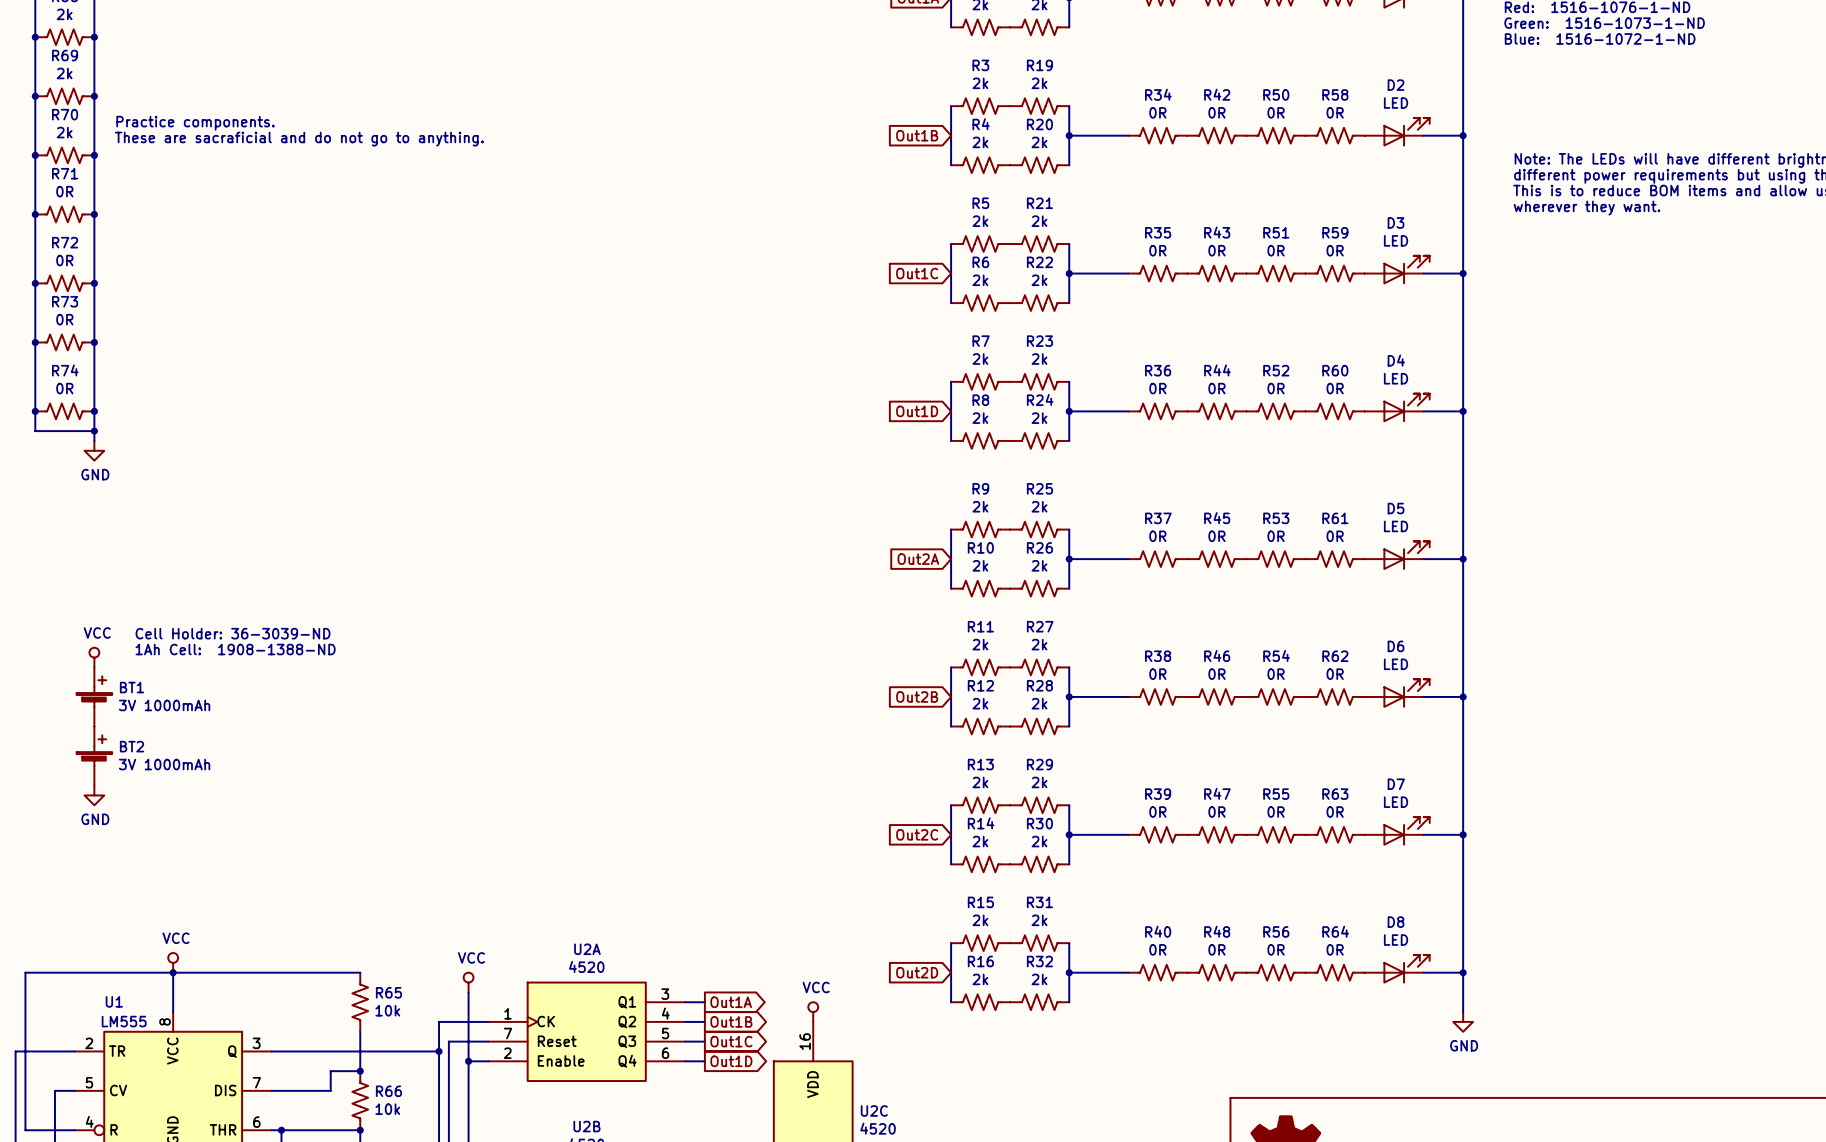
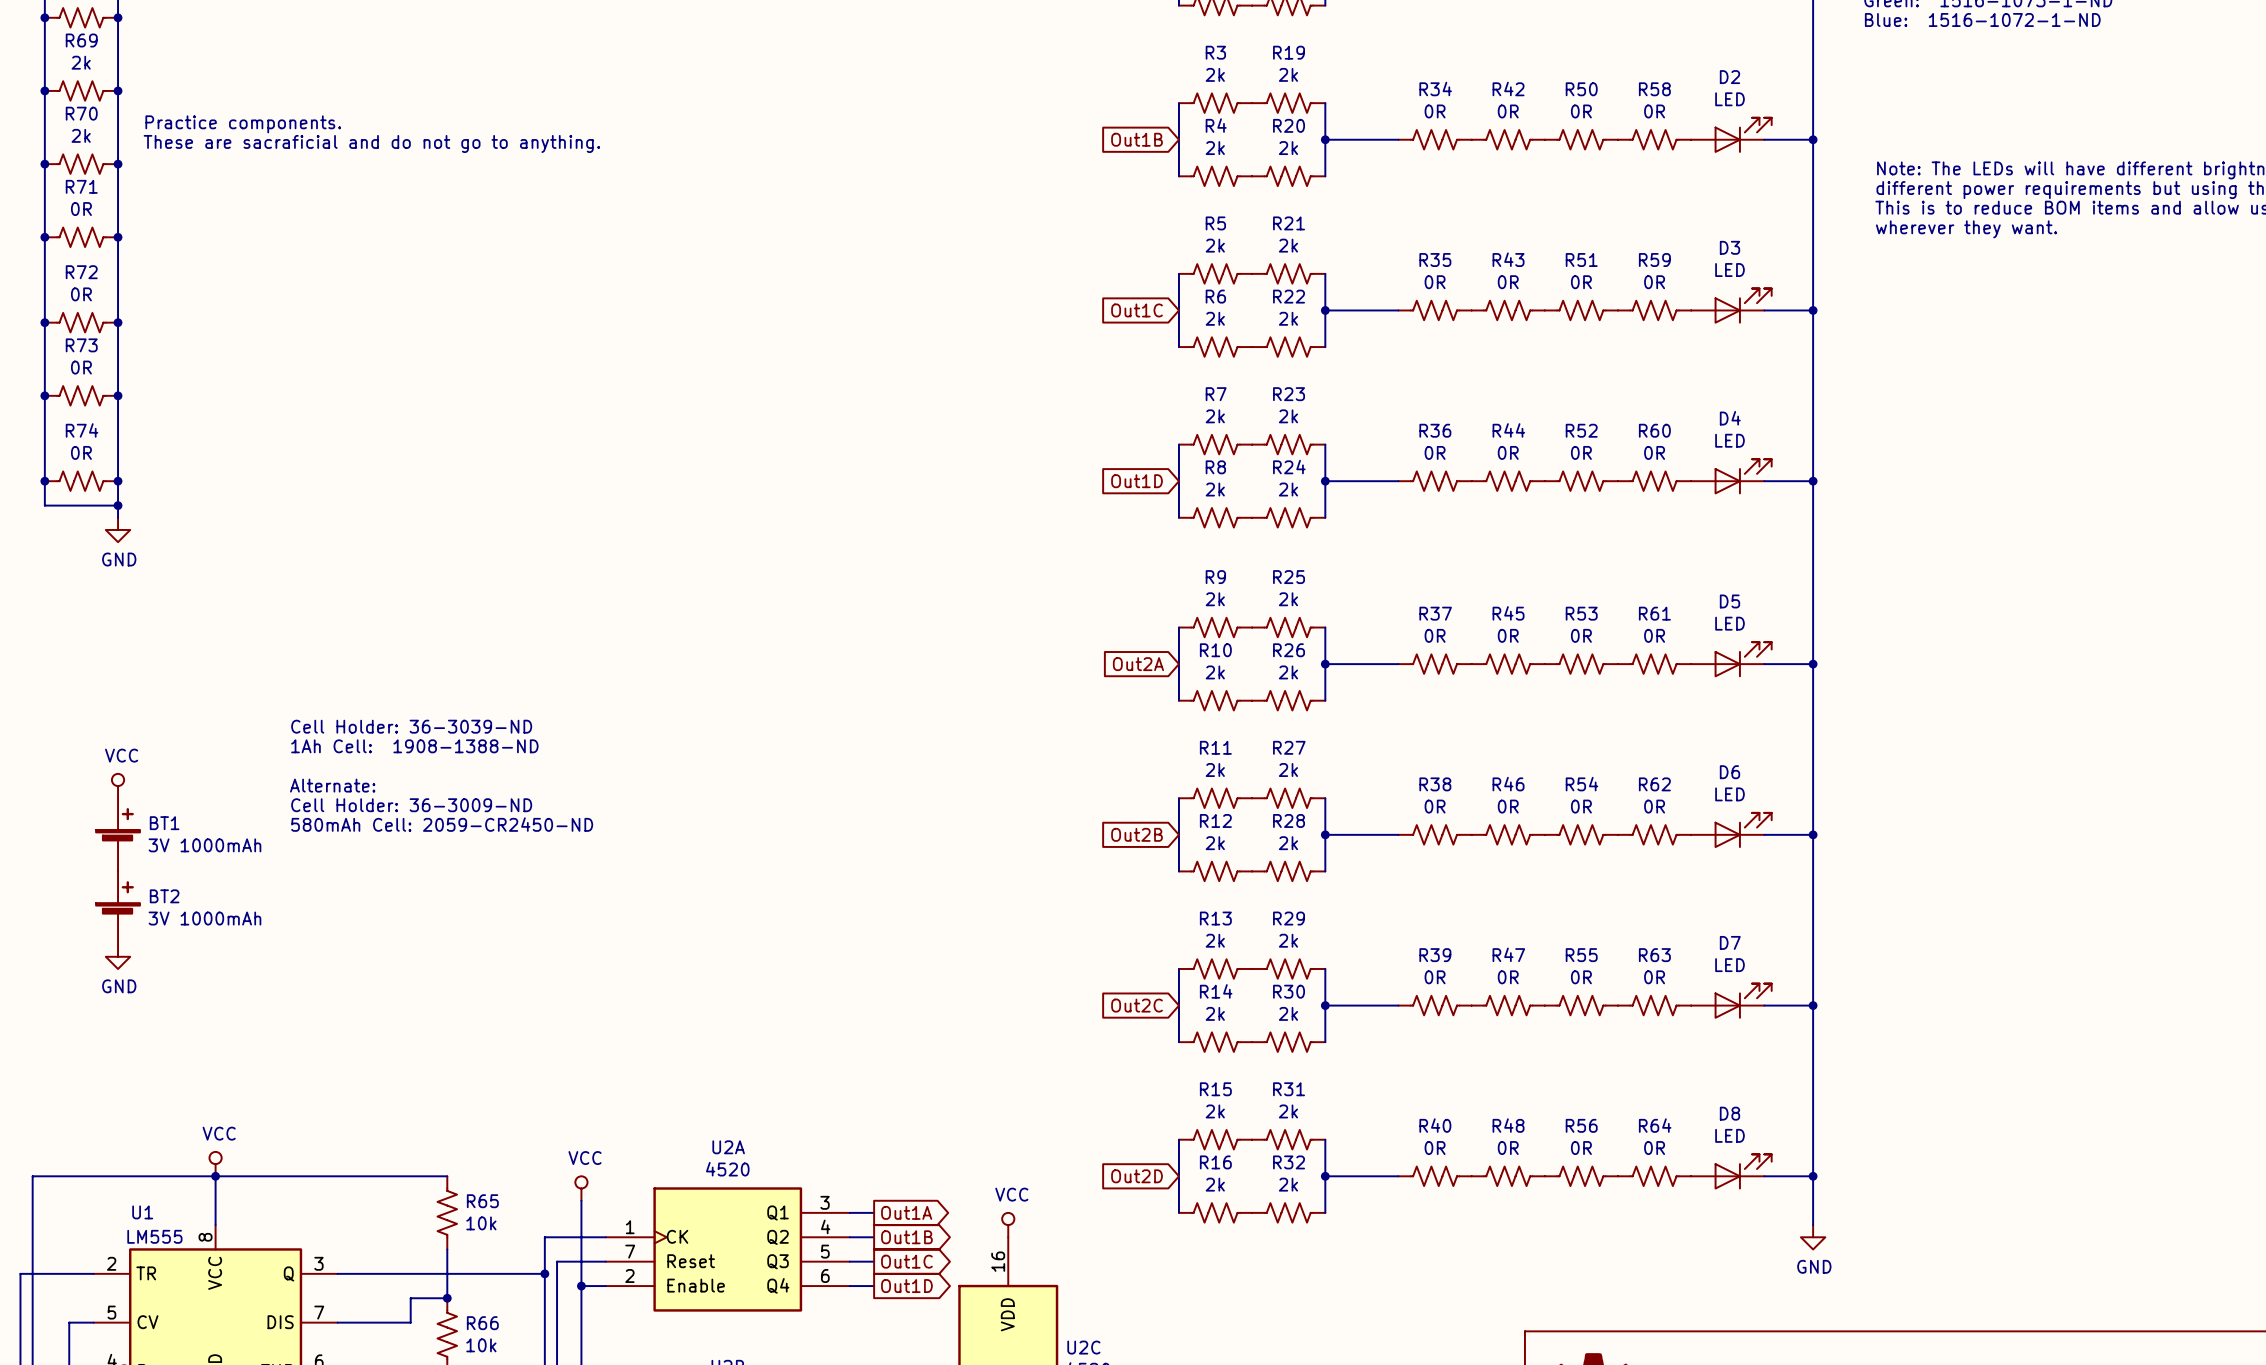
text position: Cell Holder: 36-3039-ND (233, 633) -> Cell Holder: 36-3039-ND (411, 726)
text position: 1Ah Cell: 1908-1388-ND (235, 649) -> 1Ah Cell: 1908-1388-ND (414, 746)
text: none -> Alternate: (332, 785)
text: none -> Cell Holder: 36-3009-ND (411, 805)
text: none -> 580mAh Cell: 2059-CR2450-ND (442, 824)

